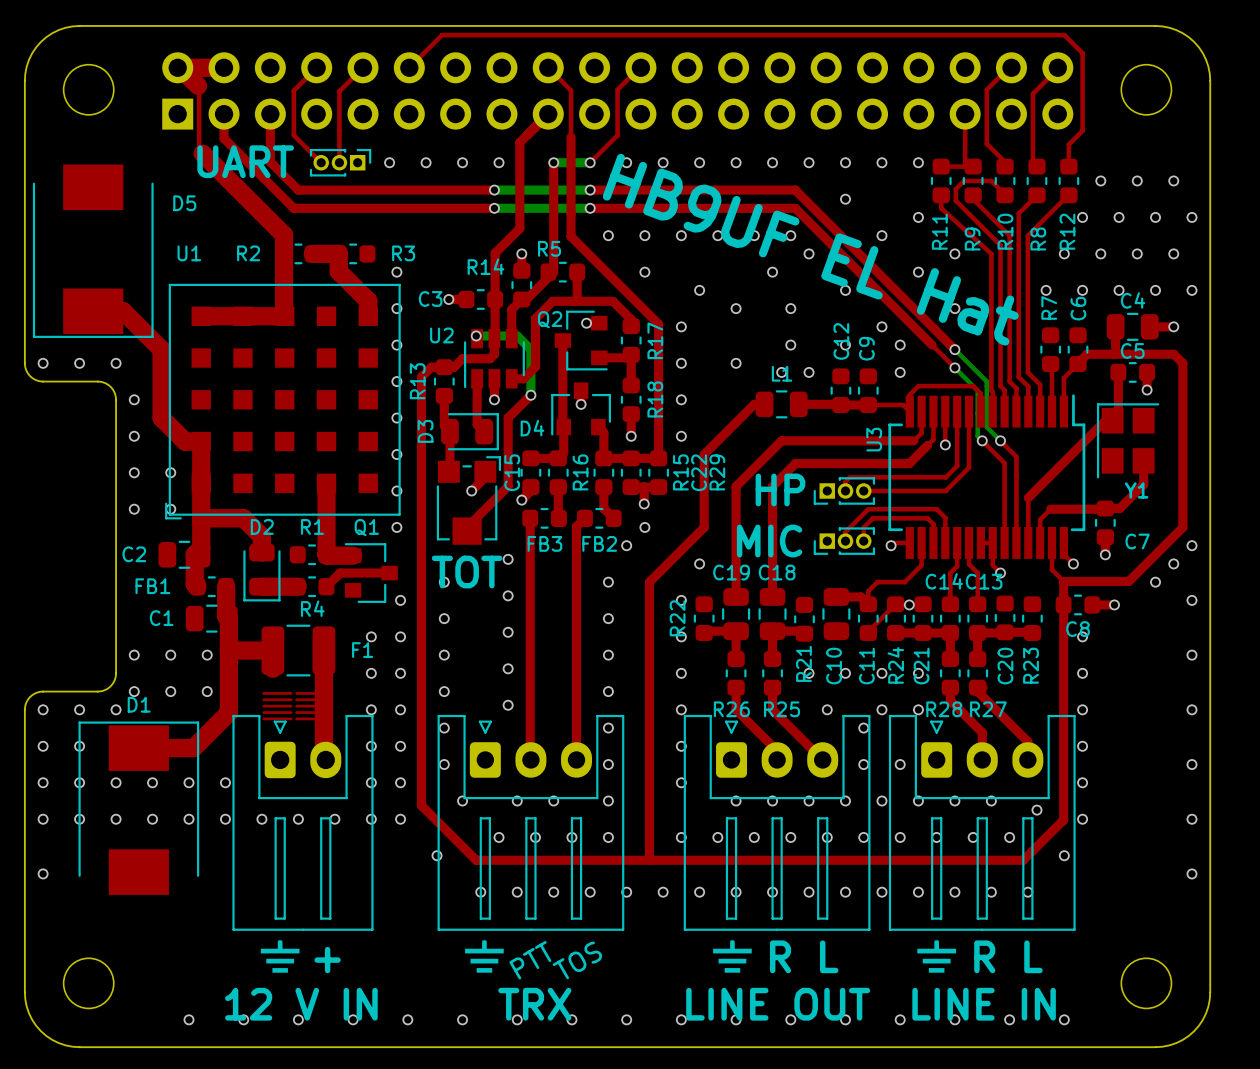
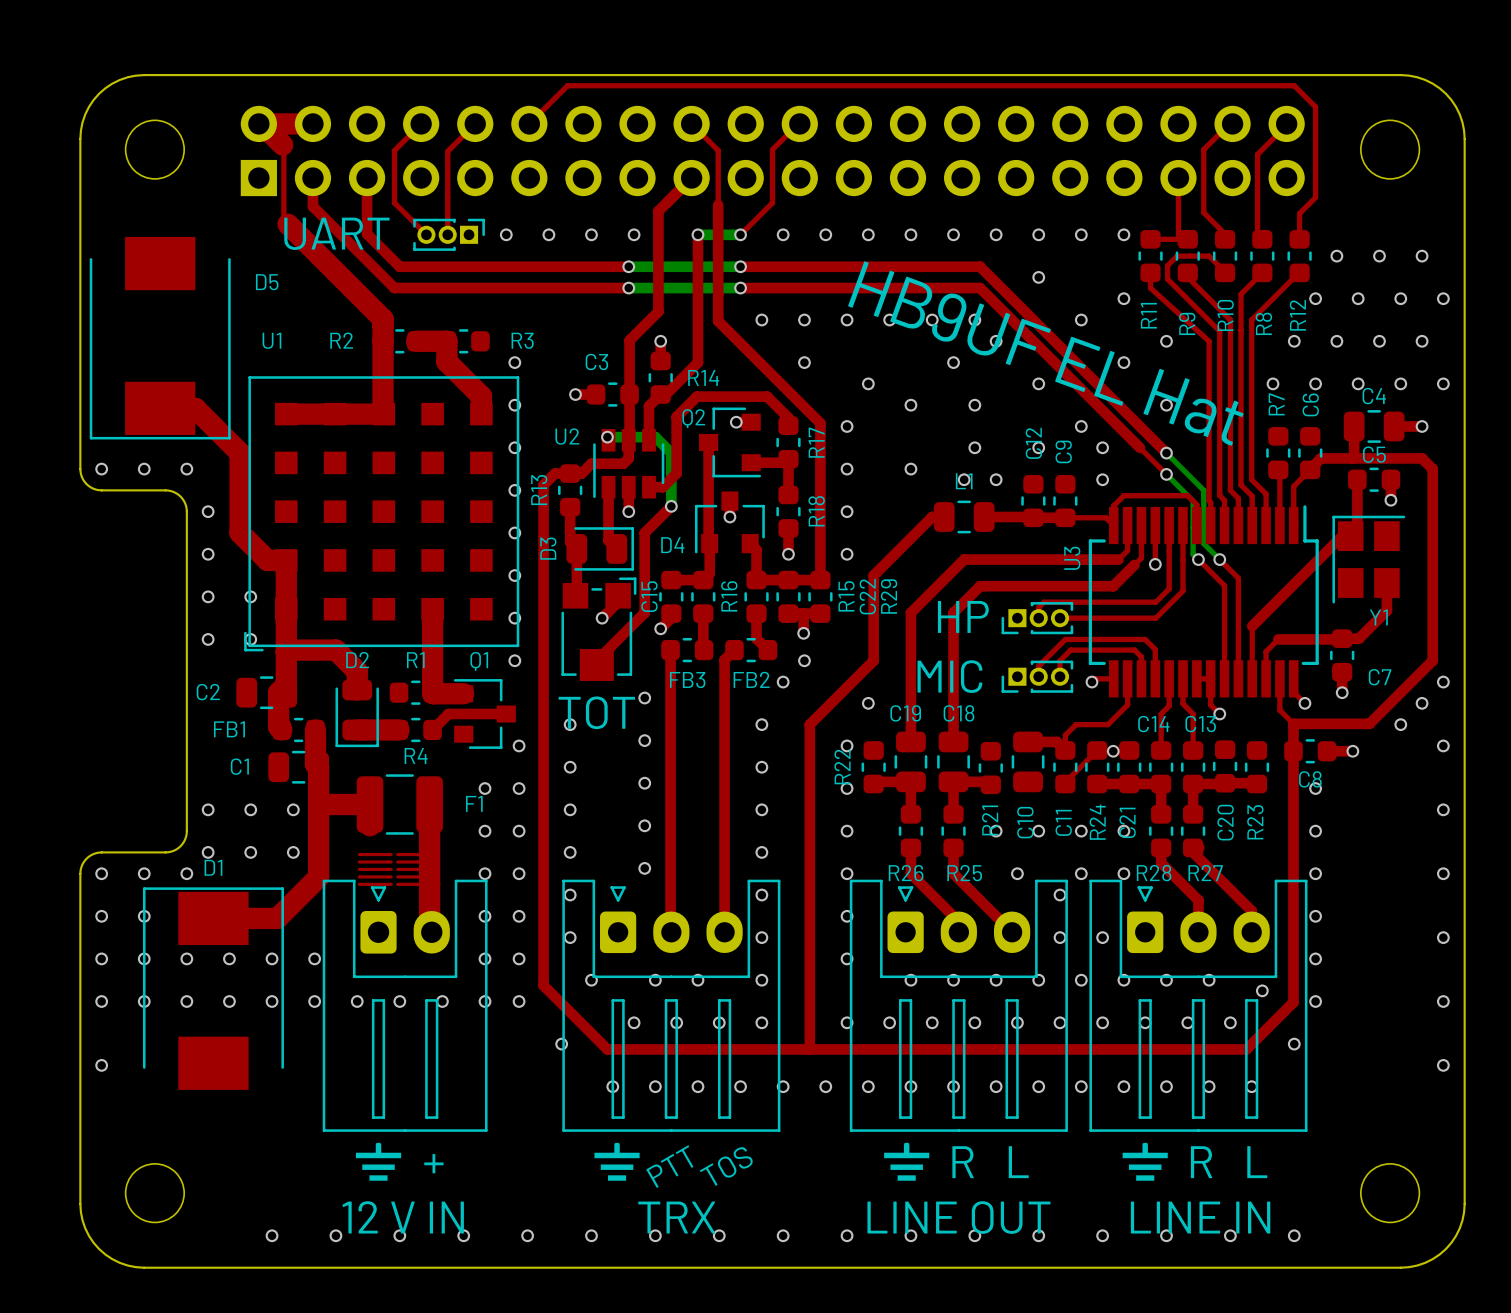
R14 name position: R14 (485, 266) -> R14 (703, 377)
R5: (562, 272) -> none
top track: (577, 272) (577, 298) (574, 301) -> none
C3 name position: C3 (430, 298) -> C3 (596, 362)

